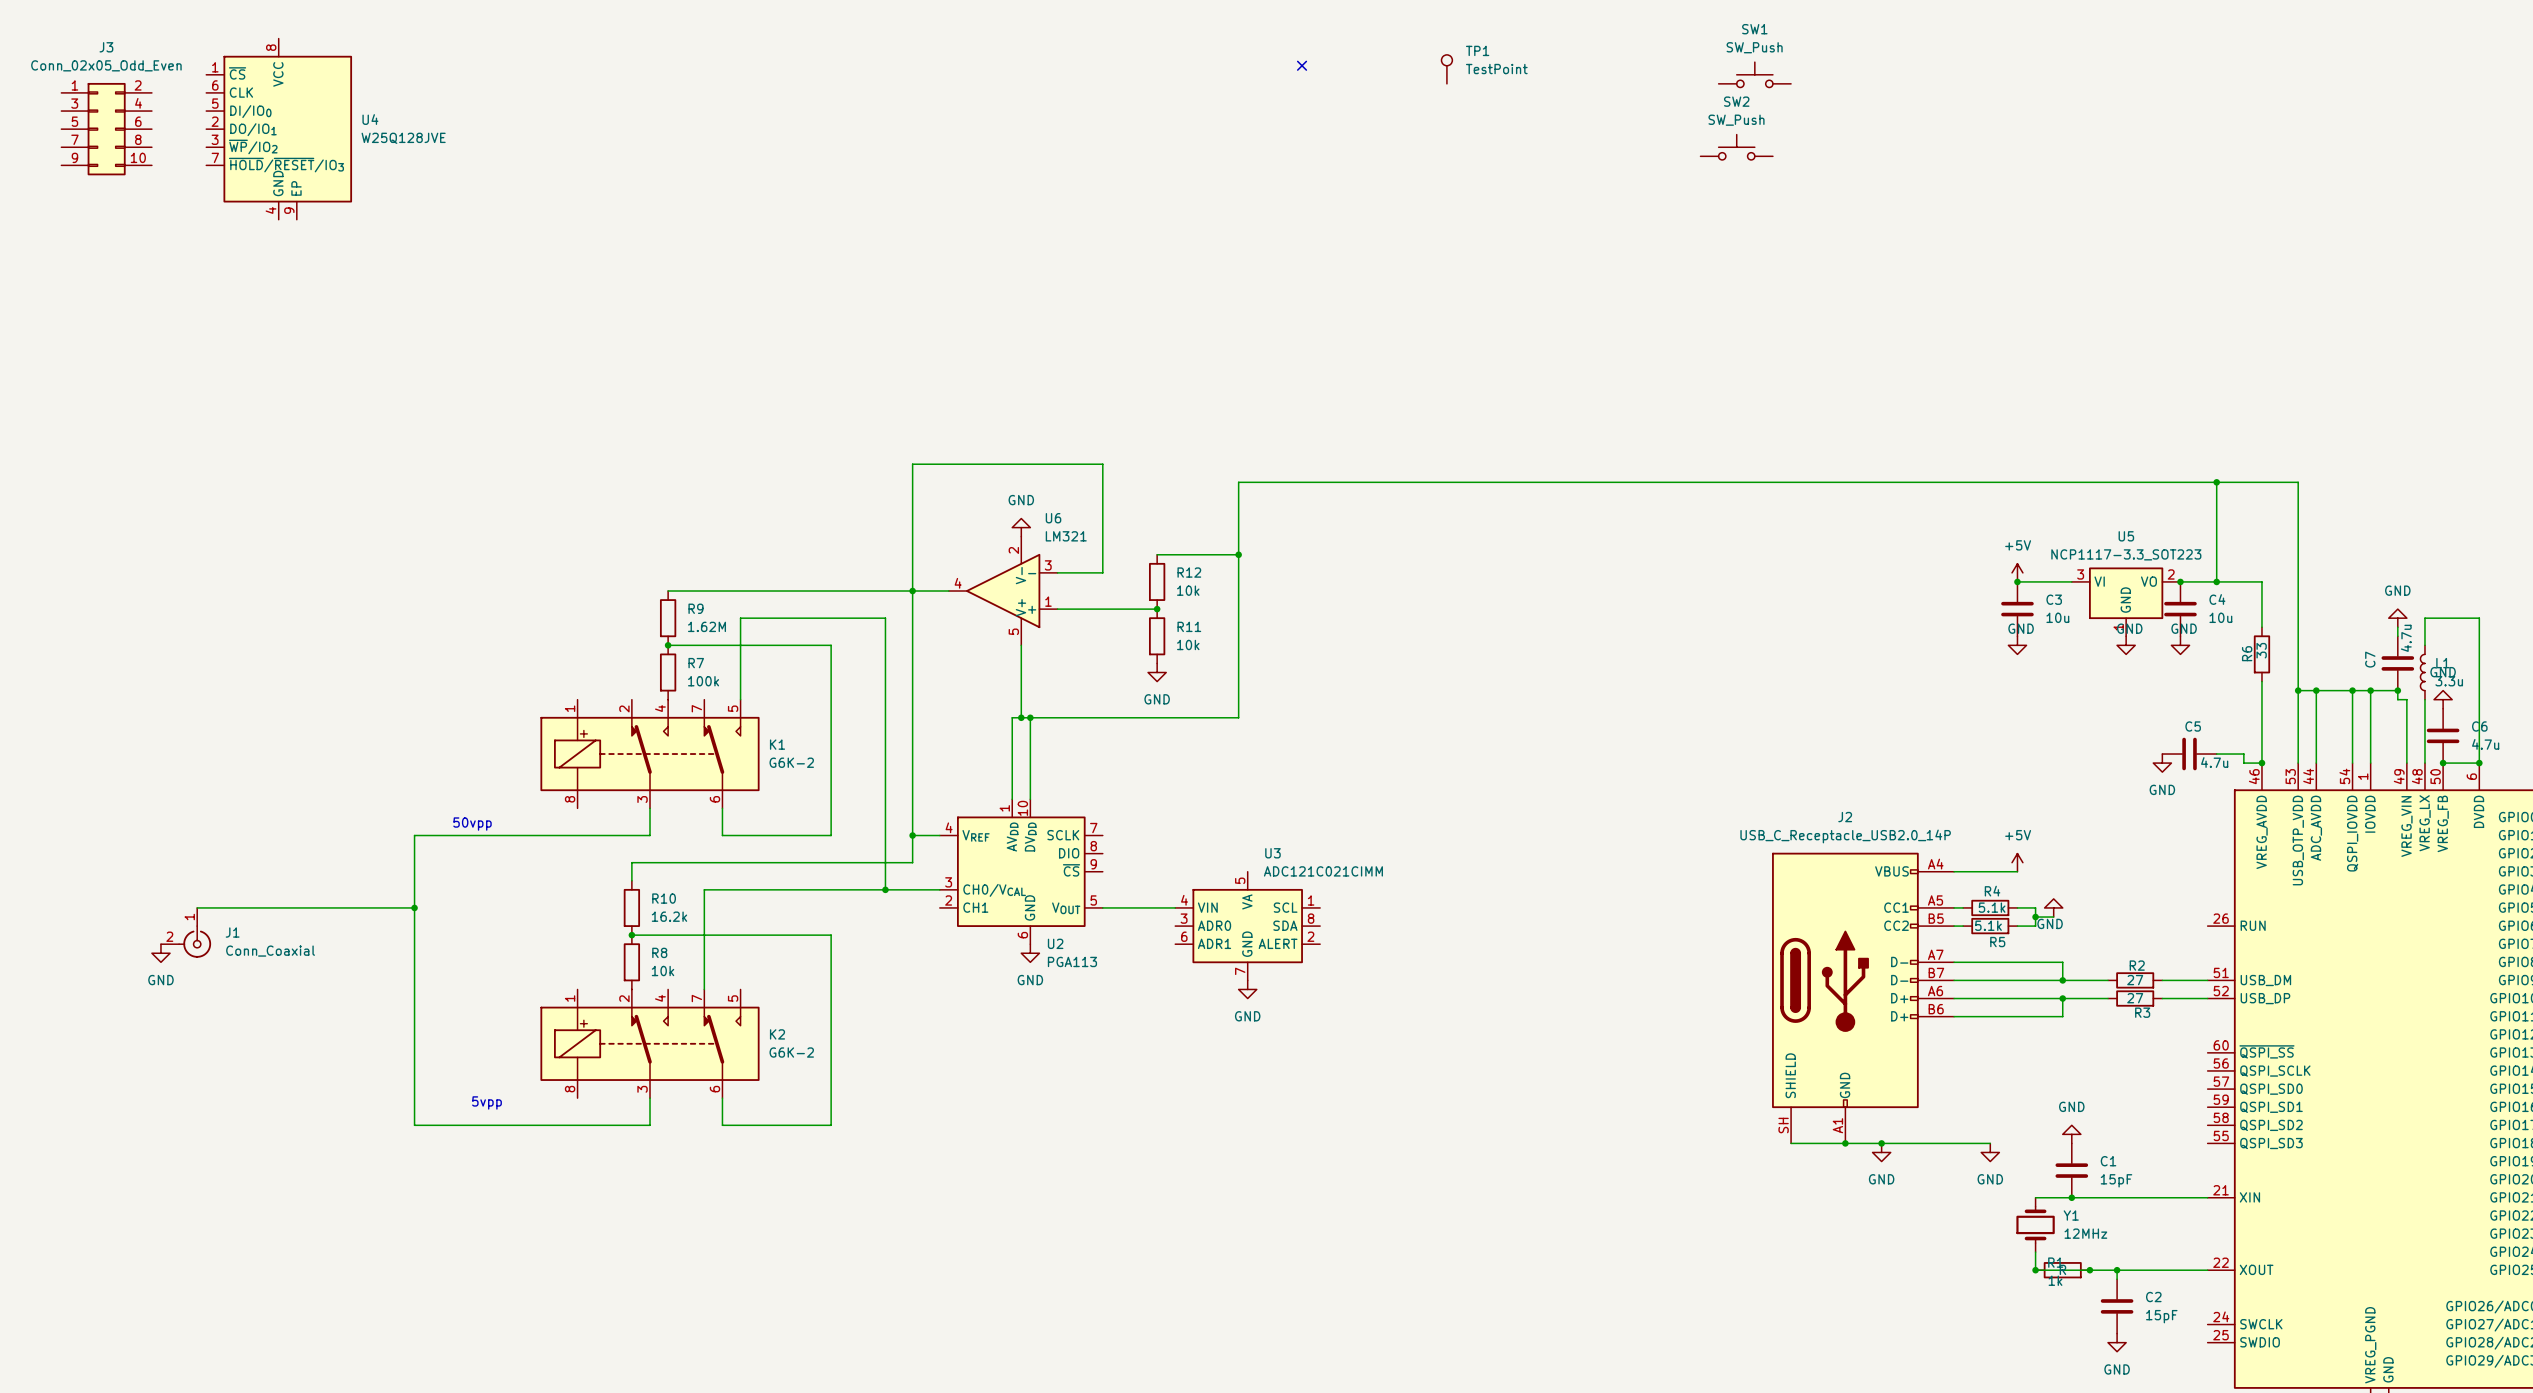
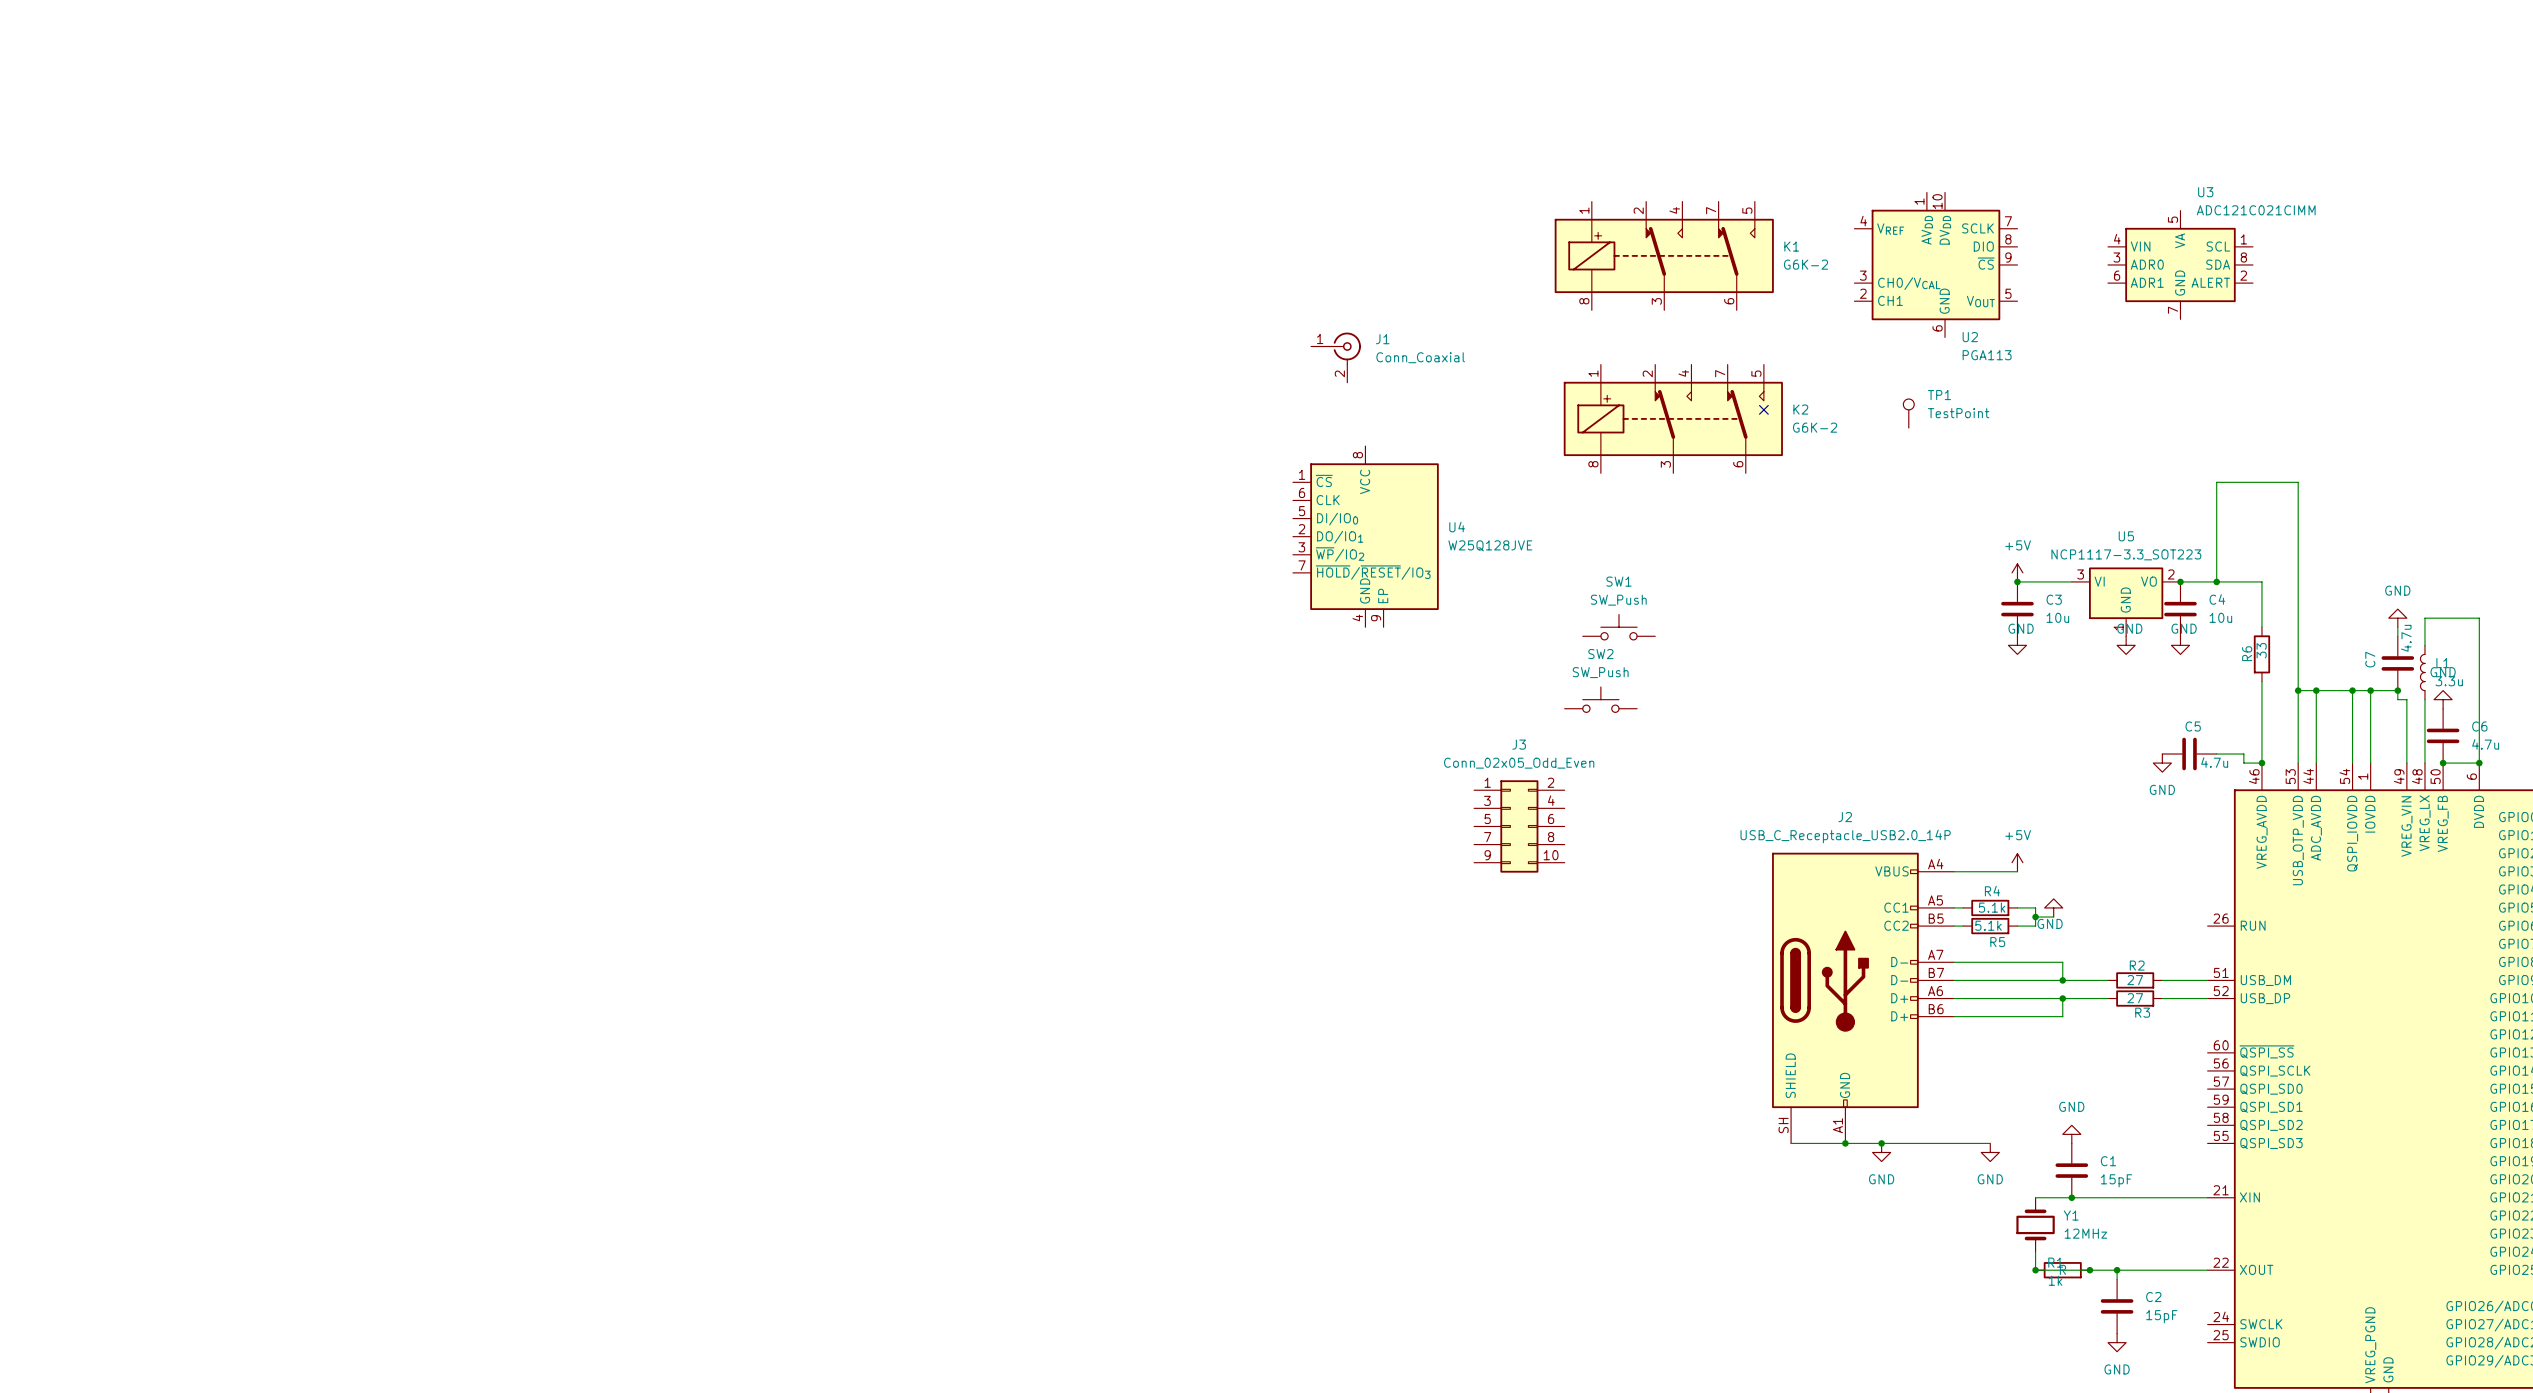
no-connect mark: (1302, 65) -> none
TP1 position: (1446, 69) -> (1908, 413)
SW1 position: (1754, 74) -> (1619, 627)
J3 position: (106, 129) -> (1519, 826)
U4 position: (279, 129) -> (1365, 536)
SW2 position: (1736, 147) -> (1600, 699)
no-connect mark: none -> (1763, 409)
wire: (2216, 482) (1238, 482) (1238, 717) (1012, 717) (1012, 799) -> none
junction: (2216, 482) -> none
power symbol: GND (1021, 527) -> none
wire: (1157, 554) (1238, 554) -> none
junction: (1238, 554) -> none
wire: (1057, 572) (1102, 572) (1102, 464) (912, 464) (912, 862) (631, 862) (631, 880) -> none
R12: 10k (1157, 581) -> none
wire: (668, 591) (948, 591) -> none
junction: (912, 591) -> none
U6: LM321 (1003, 591) -> none
wire: (1057, 609) (1157, 609) -> none
junction: (1157, 609) -> none
R9: 1.62M (668, 618) -> none
R11: 10k (1157, 636) -> none
wire: (668, 645) (831, 645) (831, 835) (722, 835) (722, 808) -> none
junction: (668, 645) -> none
wire: (1021, 645) (1021, 717) -> none
R7: 100k (668, 672) -> none
power symbol: GND (1157, 672) -> none
wire: (740, 699) (740, 618) (885, 618) (885, 889) -> none
junction: (1021, 717) -> none
wire: (1030, 717) (1030, 799) -> none
junction: (1030, 717) -> none
K1 position: (650, 754) -> (1664, 255)
wire: (650, 808) (650, 835) (414, 835) (414, 1125) (650, 1125) (650, 1098) -> none
text: 50vpp (472, 824) -> none
wire: (912, 835) (939, 835) -> none
junction: (912, 835) -> none
U2 position: (1021, 871) -> (1935, 264)
junction: (885, 889) -> none
wire: (939, 889) (704, 889) (704, 989) -> none
wire: (197, 907) (414, 907) -> none
junction: (414, 907) -> none
R10: 16.2k (631, 907) -> none
wire: (1102, 907) (1175, 907) -> none
U3 position: (1247, 926) -> (2180, 264)
J1 position: (186, 932) -> (1335, 357)
J1 name position: J1 (232, 932) -> J1 (1382, 339)
wire: (631, 935) (831, 935) (831, 1125) (722, 1125) (722, 1098) -> none
junction: (631, 935) -> none
J1 rotation: 0° (195, 941) -> 90° counterclockwise (1345, 348)
J1 value position: Conn_Coaxial (270, 951) -> Conn_Coaxial (1420, 357)
power symbol: GND (160, 953) -> none
power symbol: GND (1030, 953) -> none
R8: 10k (631, 962) -> none
power symbol: GND (1247, 989) -> none
K2 position: (650, 1043) -> (1673, 418)
text: 5vpp (486, 1102) -> none

